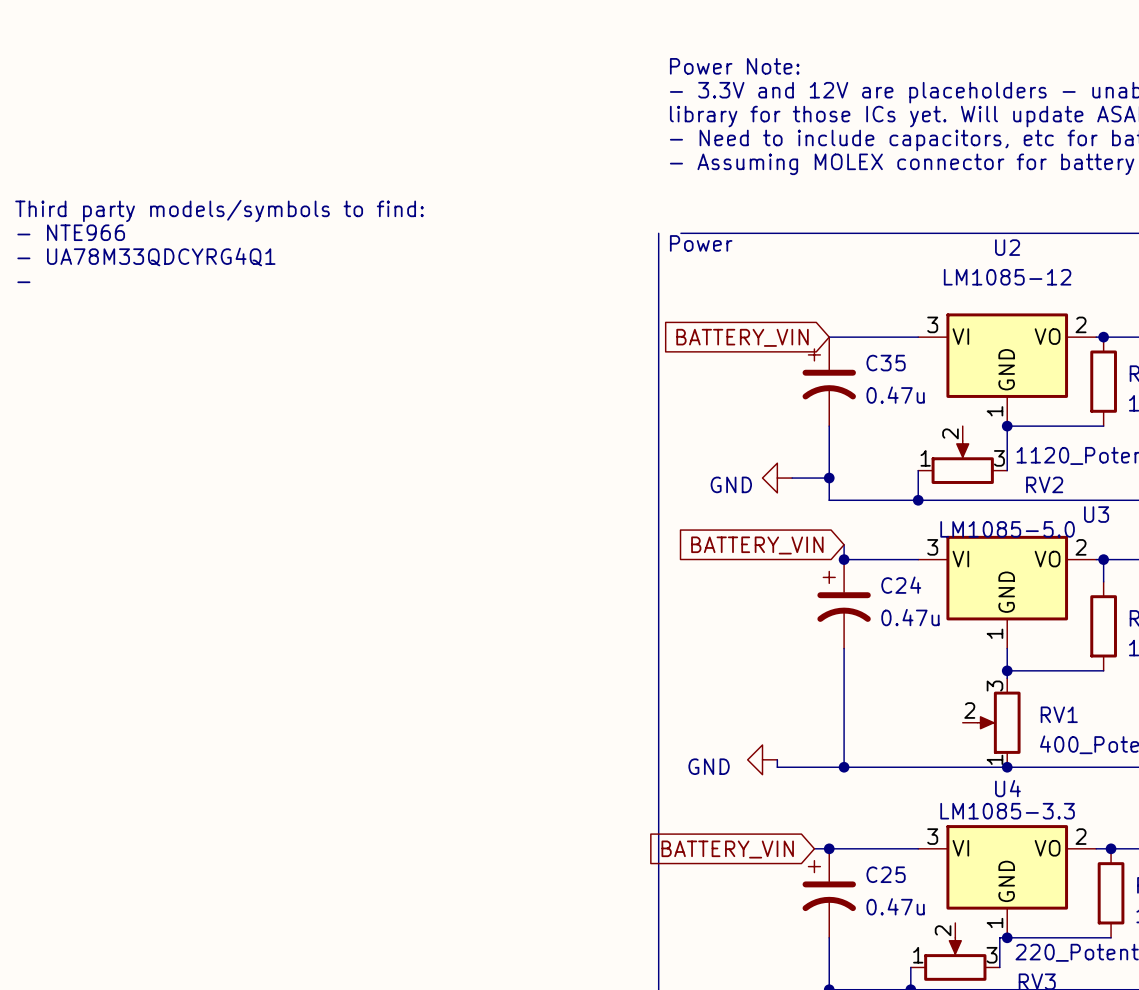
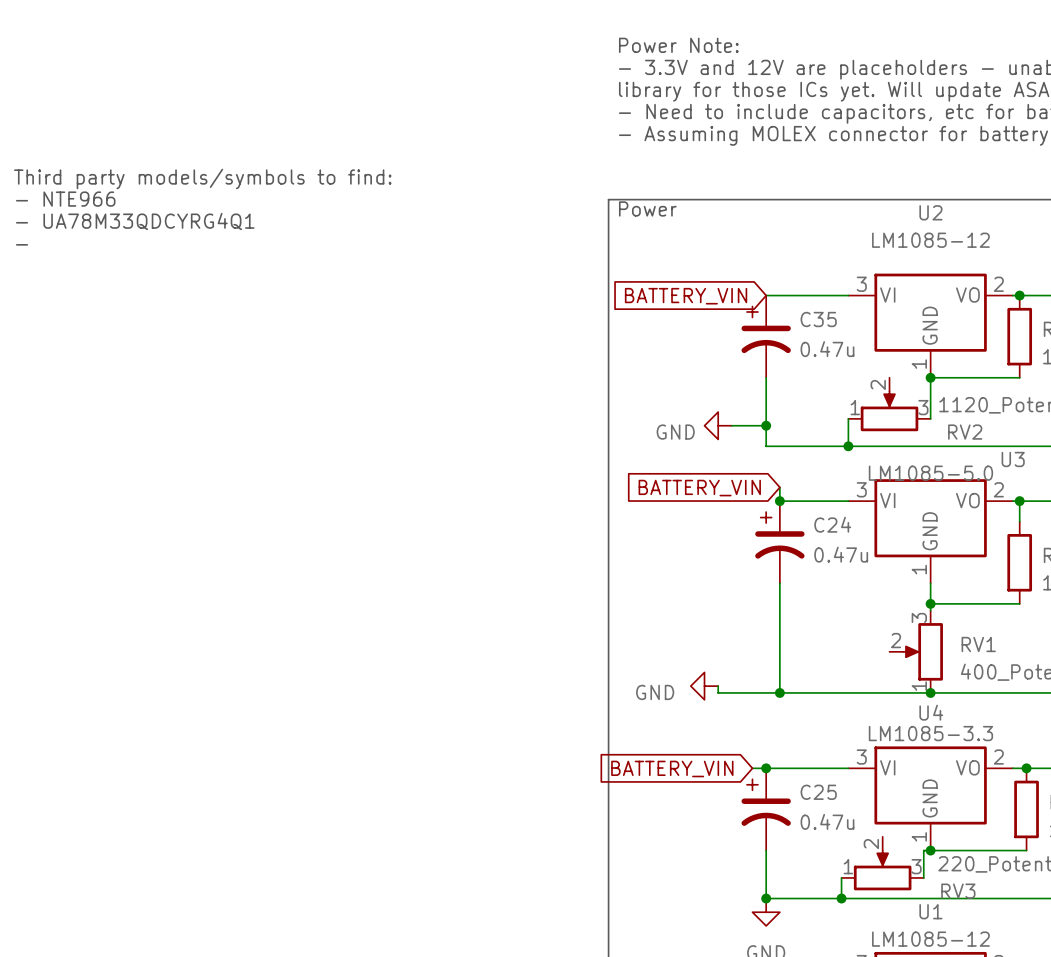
line: none -> (608, 199) (629, 199)

